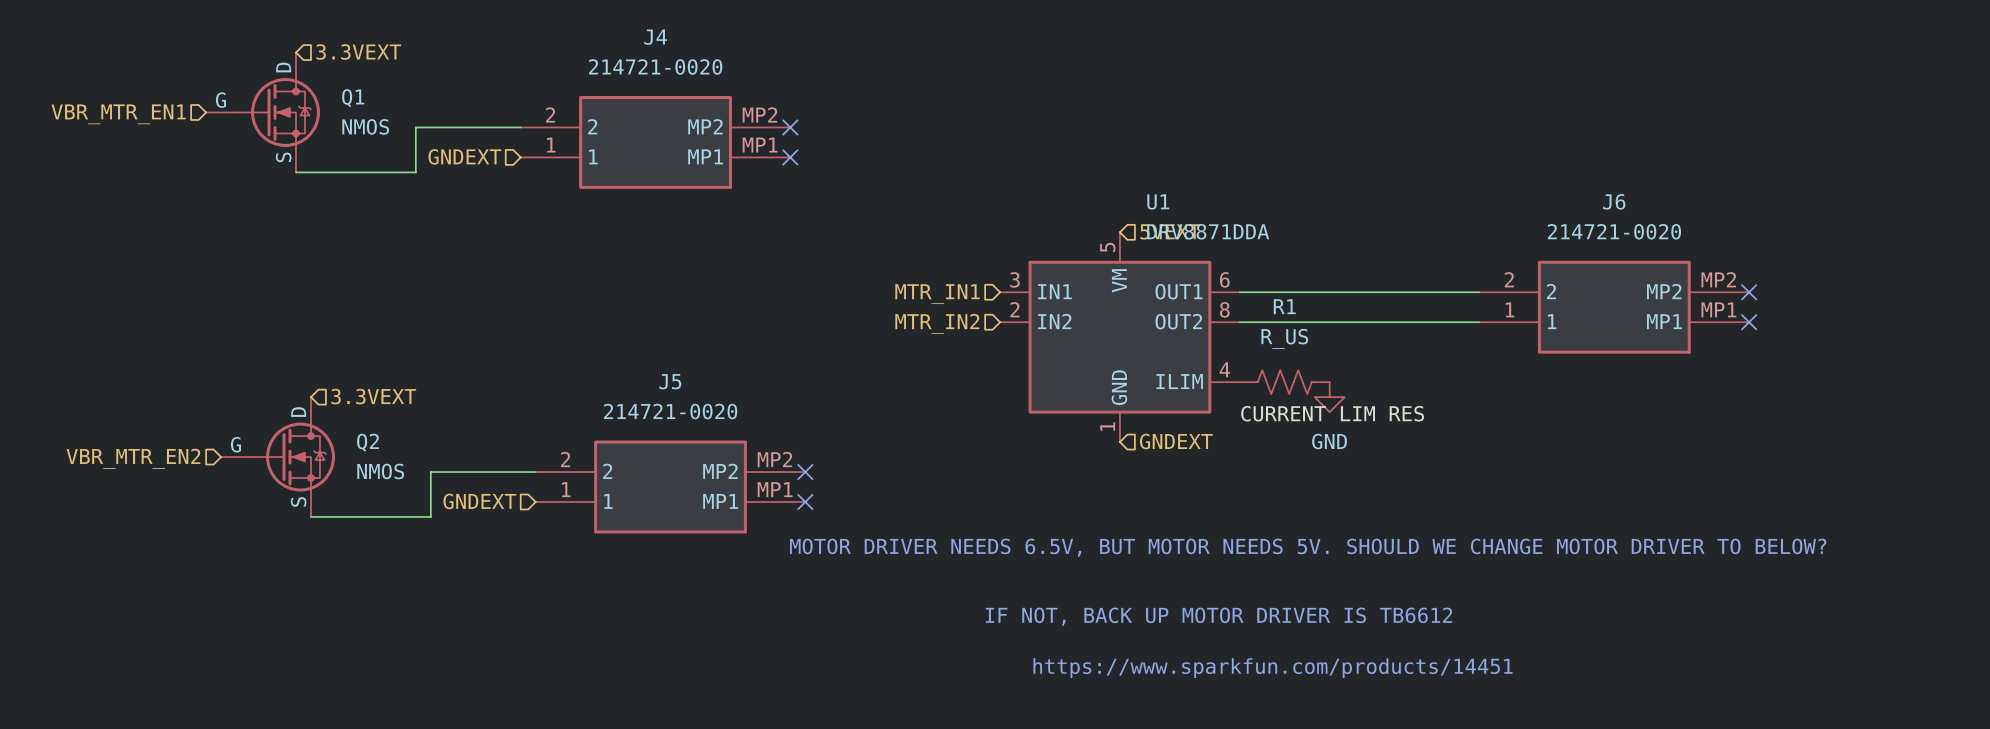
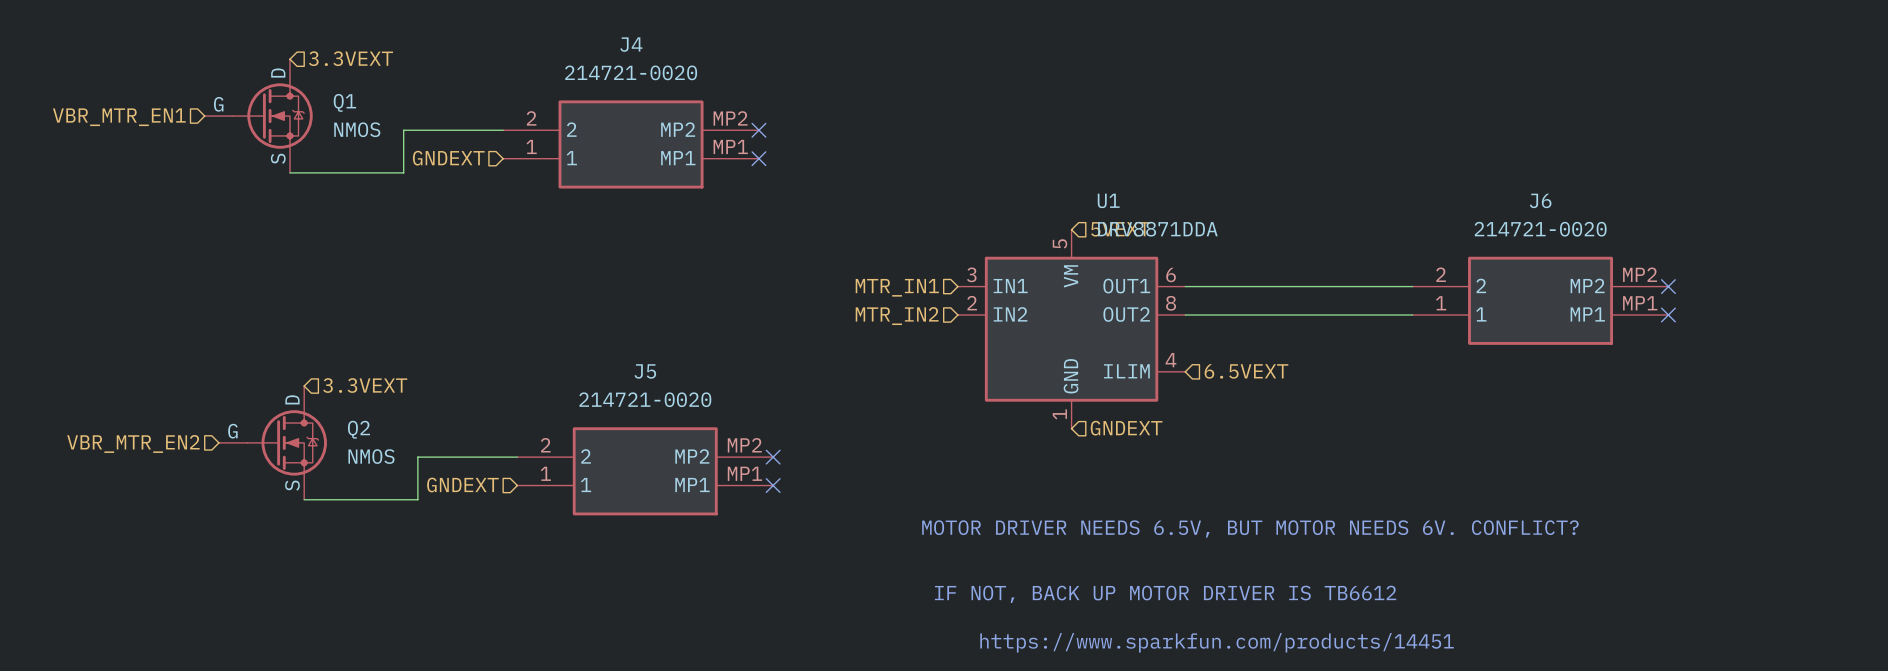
hierarchical label: none -> 6.5VEXT (1246, 371)
R1: R_US (1284, 382) -> none
power symbol: GND (1329, 397) -> none
label: CURRENT LIM RES (1332, 413) -> none
text: MOTOR DRIVER NEEDS 6.5V, BUT MOTOR NEEDS 5V. SHOULD WE CHANGE MOTOR DRIVER TO BELOW? (1308, 547) -> MOTOR DRIVER NEEDS 6.5V, BUT MOTOR NEEDS 6V. CONFLICT? (1250, 528)

